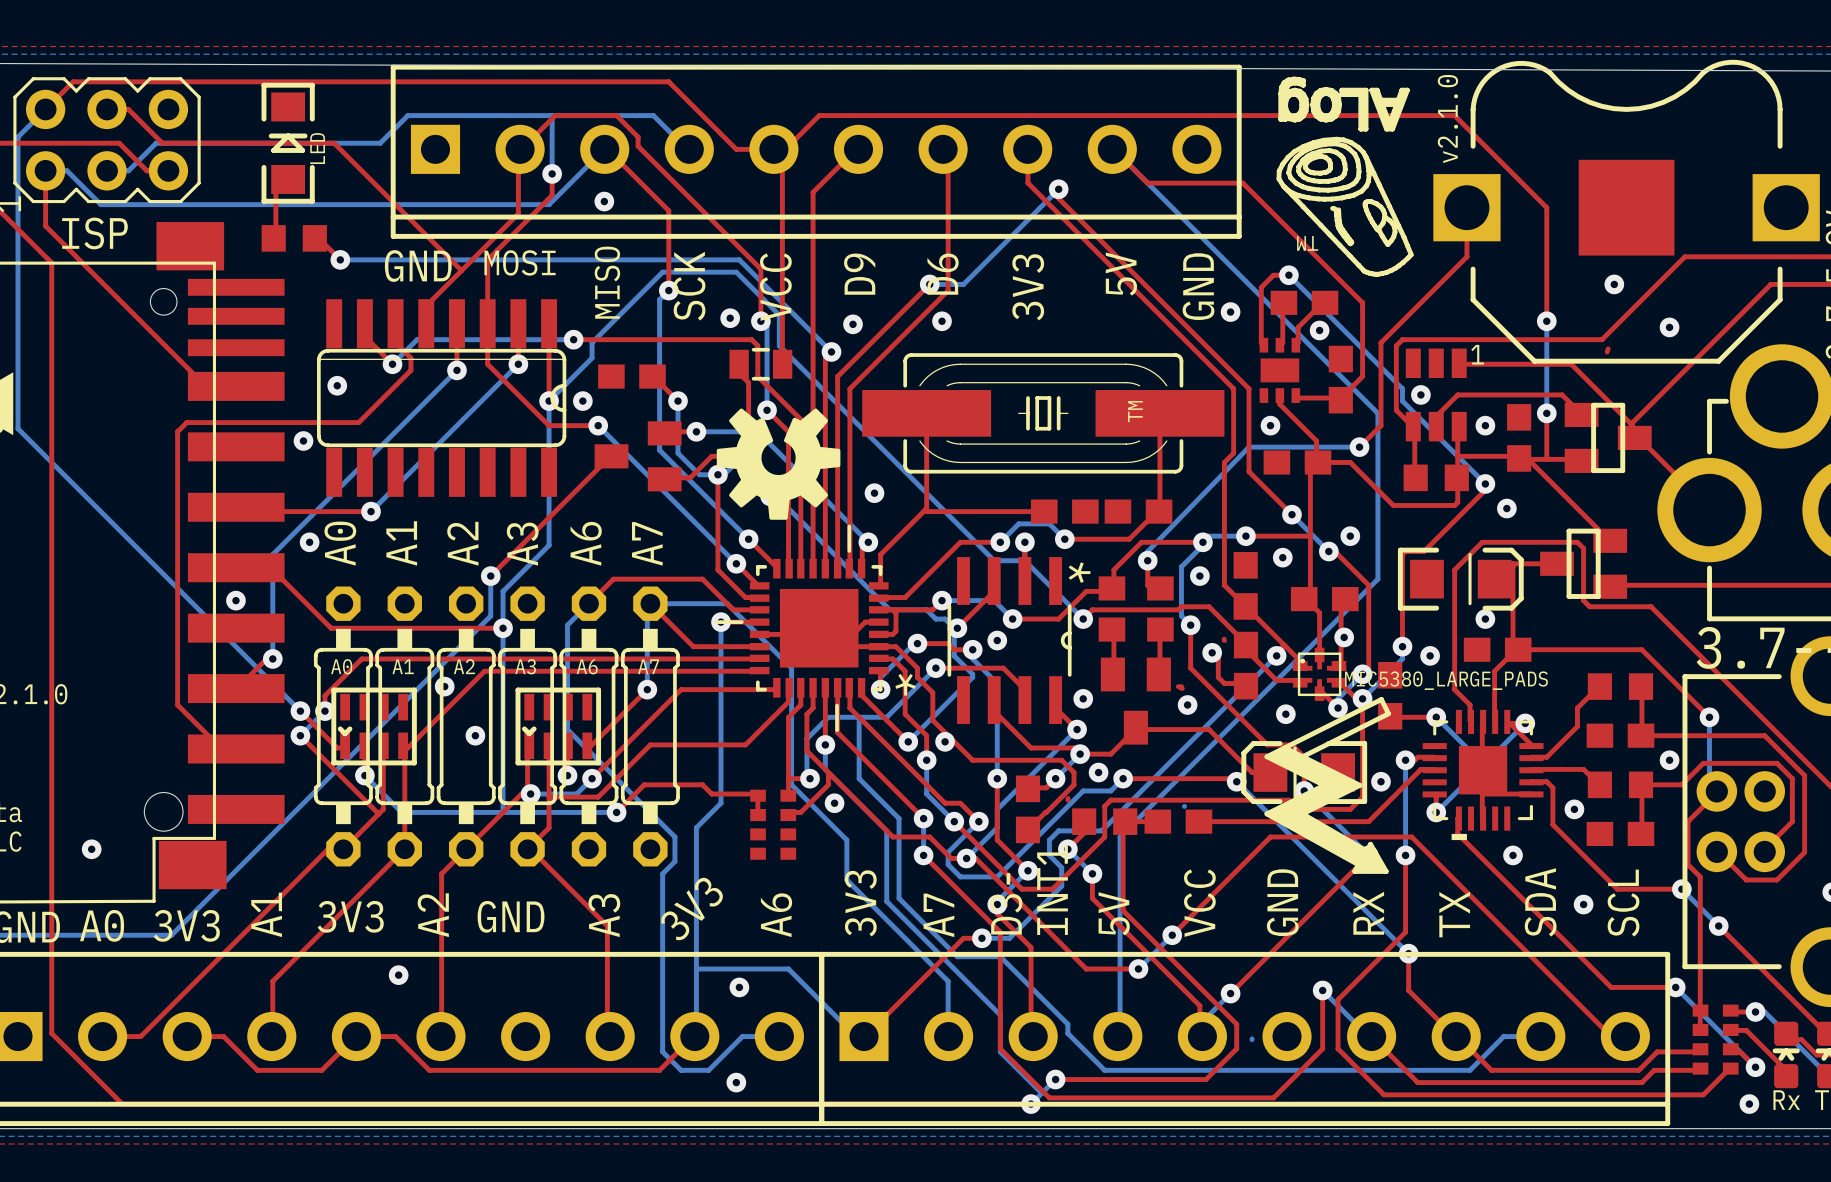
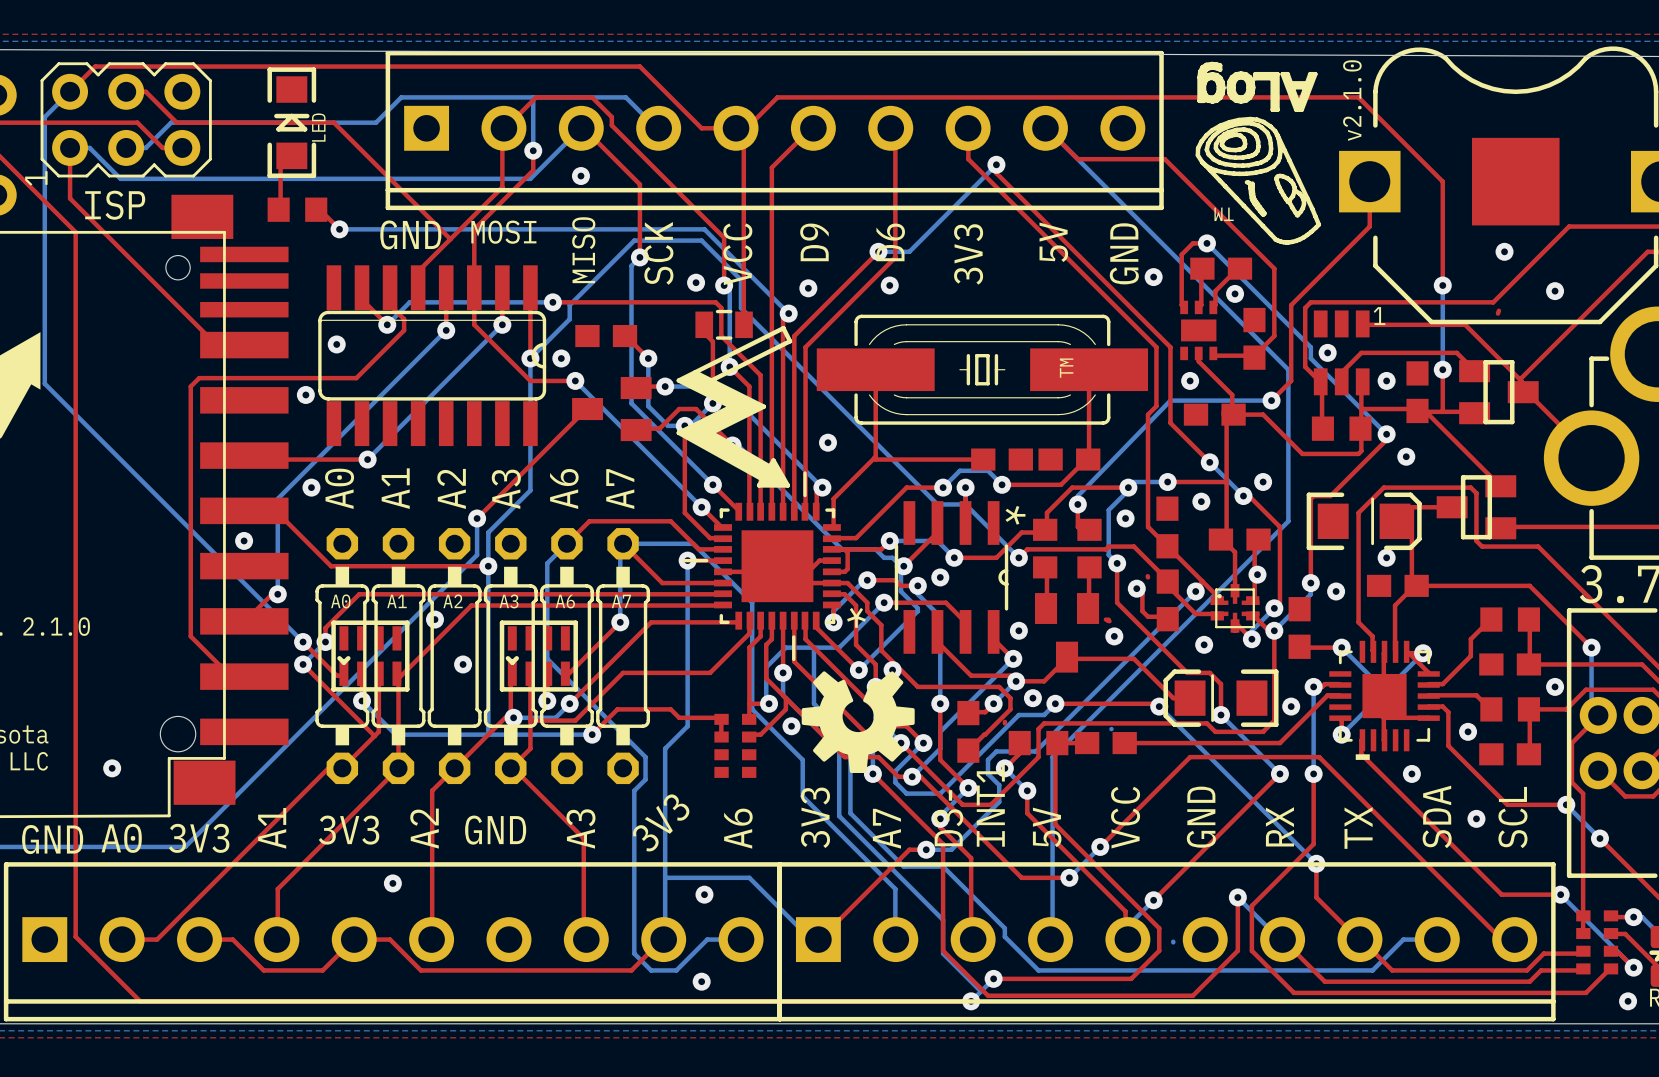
drawing: none -> [676, 325, 793, 488]
drawing position: (778, 464) -> (858, 722)
part value: MIC5380_LARGE_PADS (1446, 680) -> none
drawing: [1264, 697, 1391, 874] -> none

